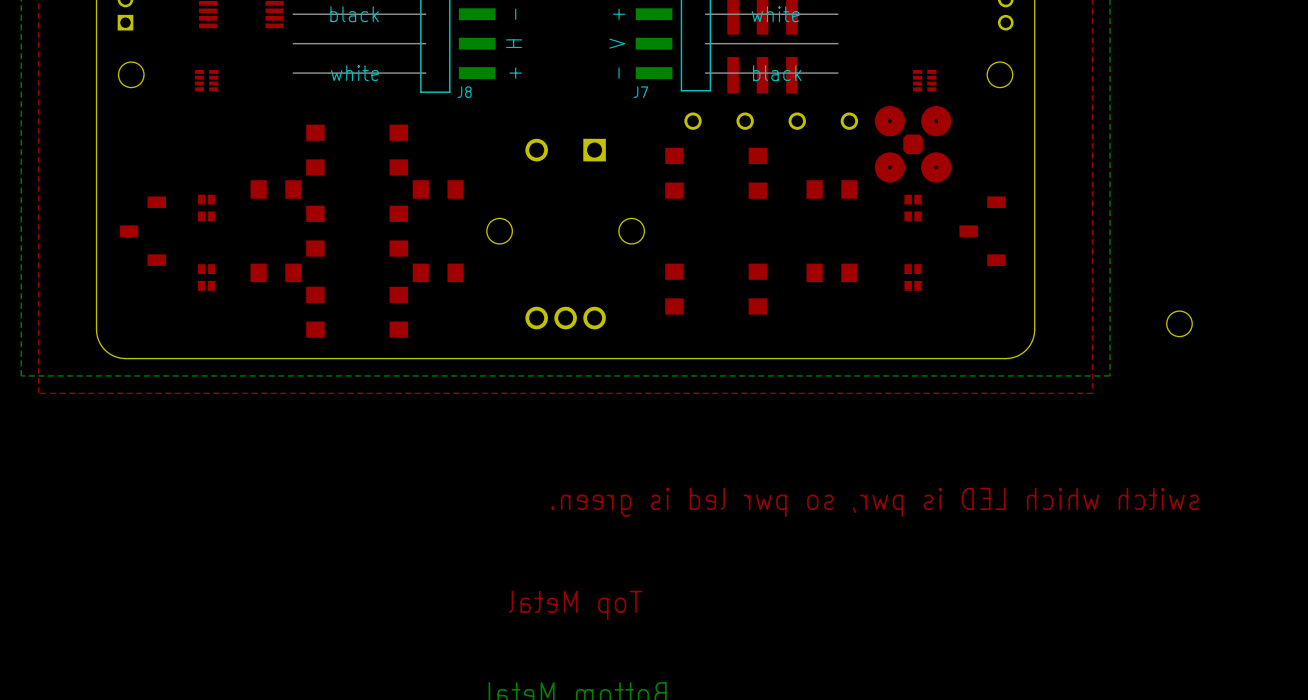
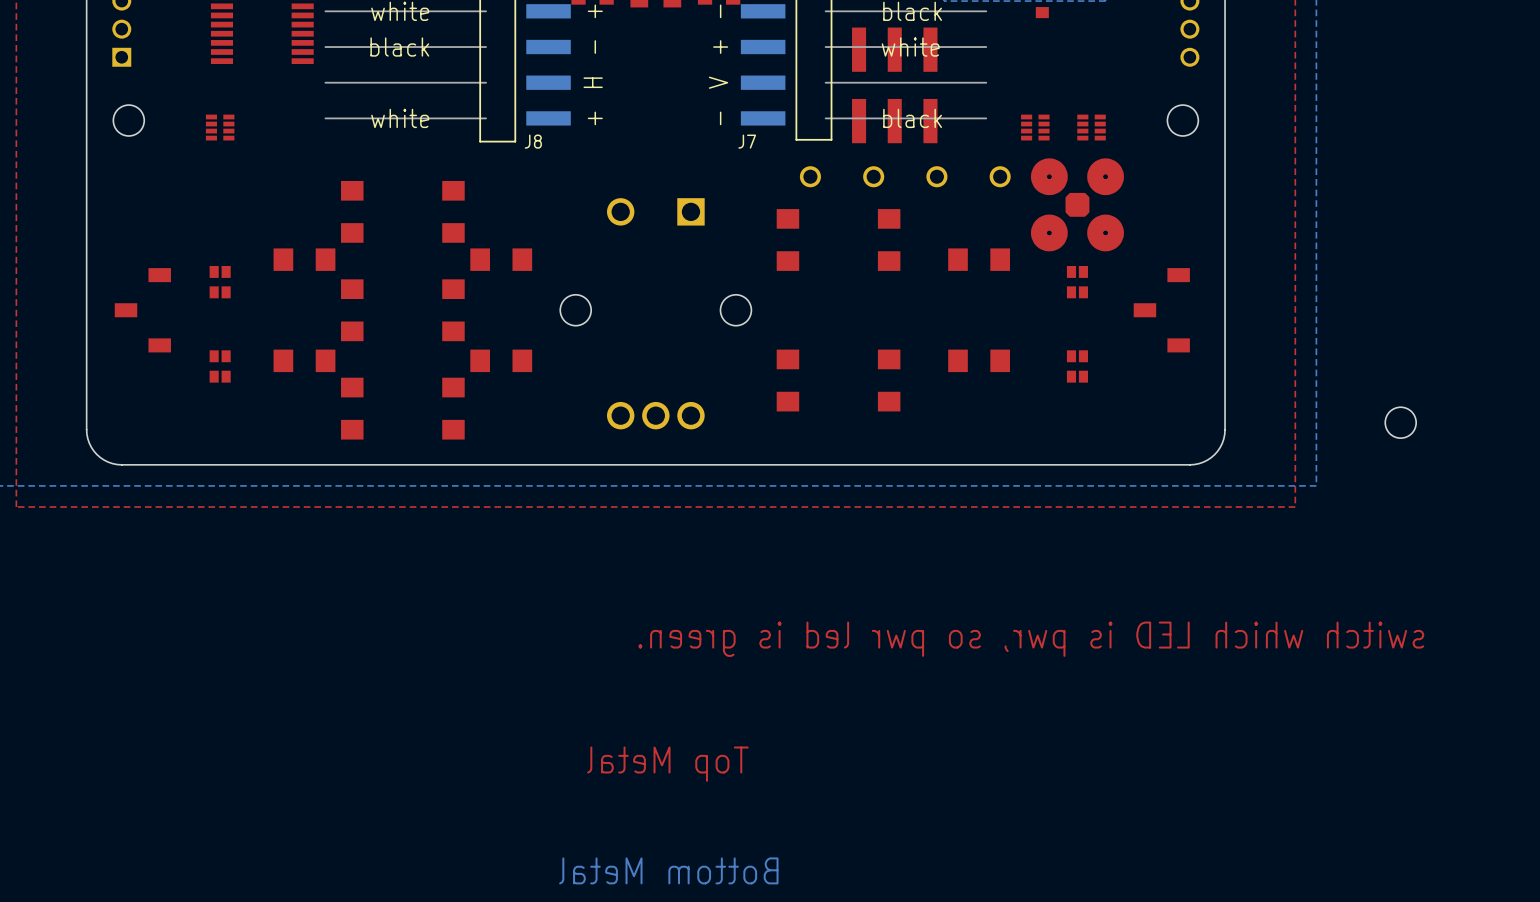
part: none -> (1035, 127)

